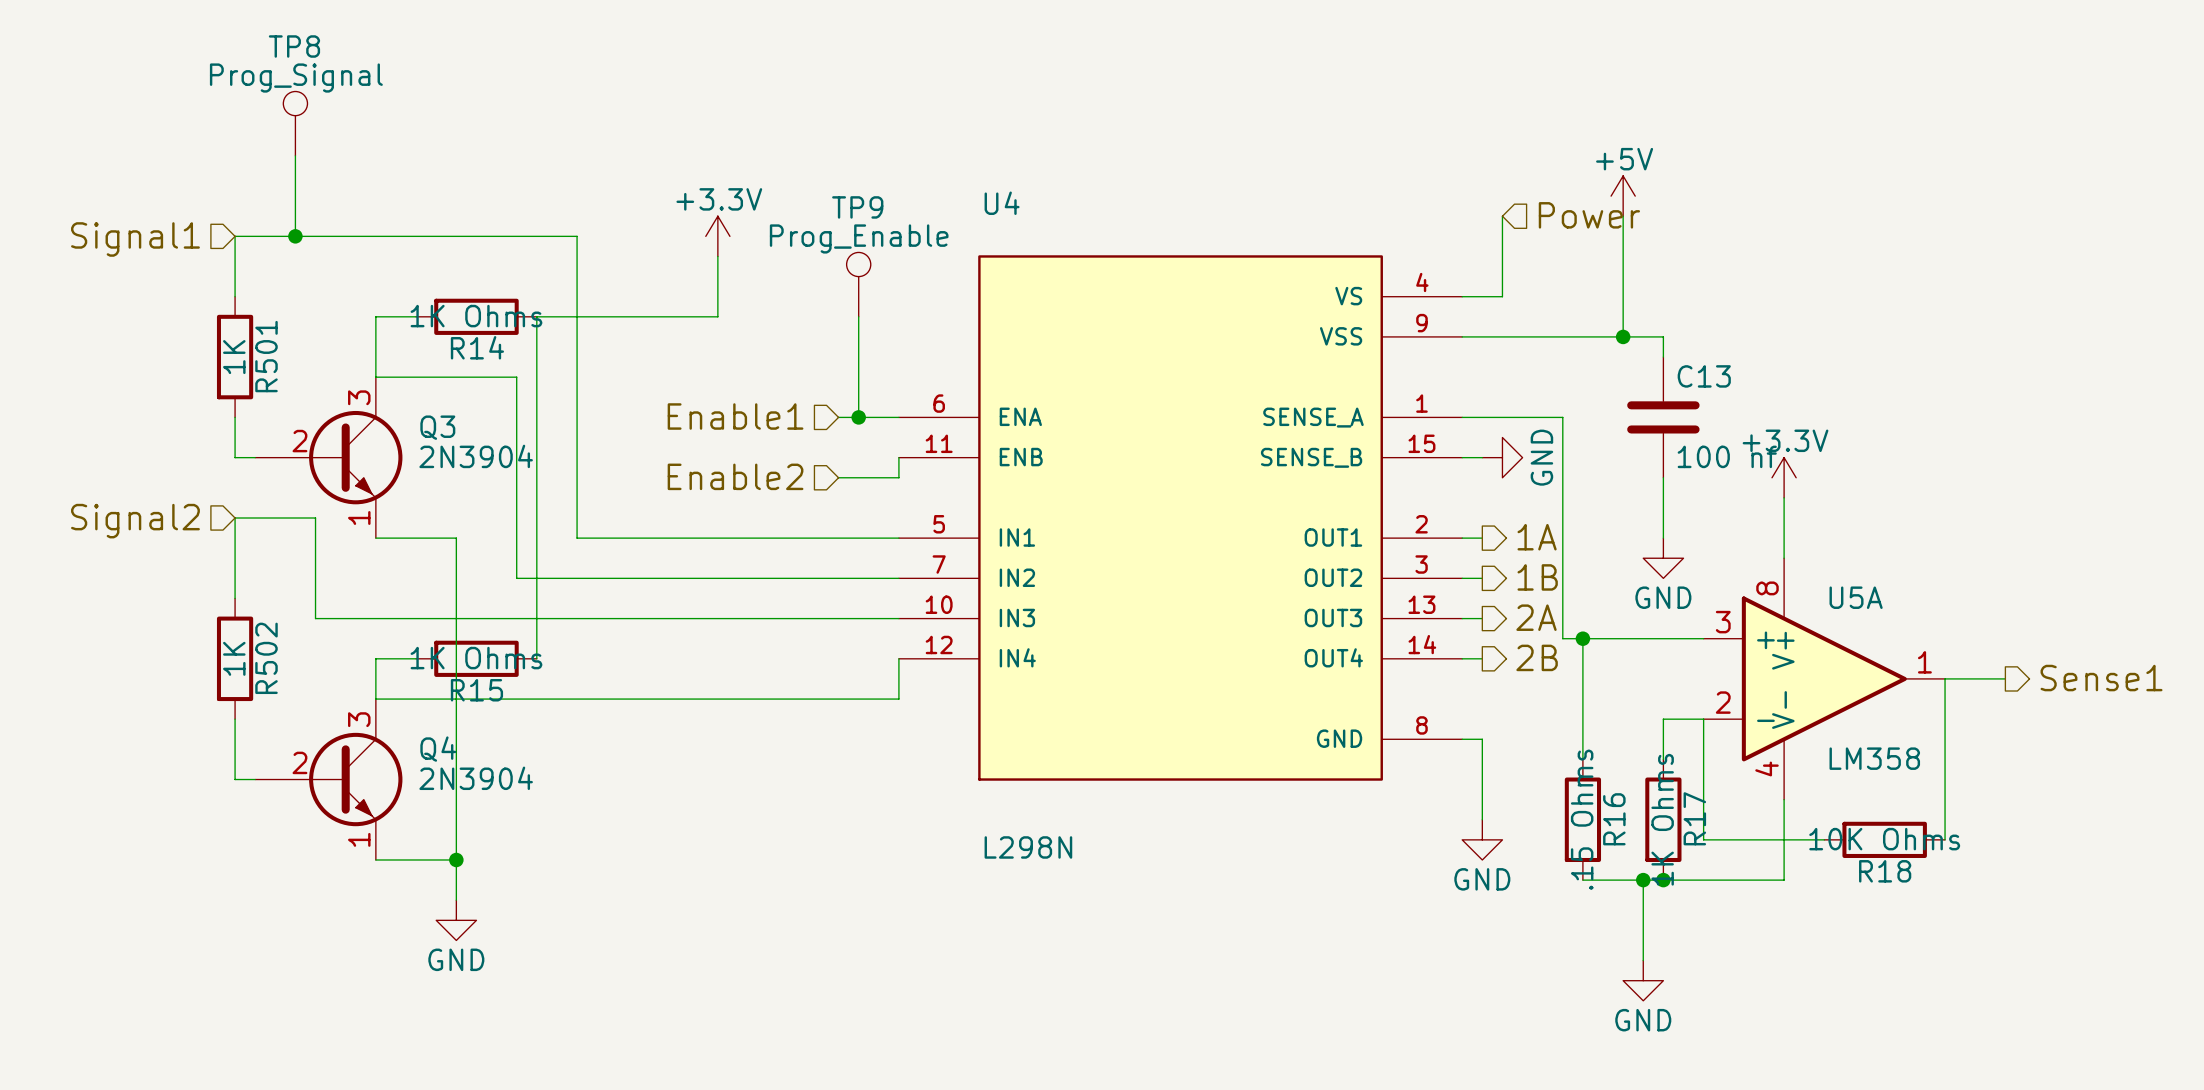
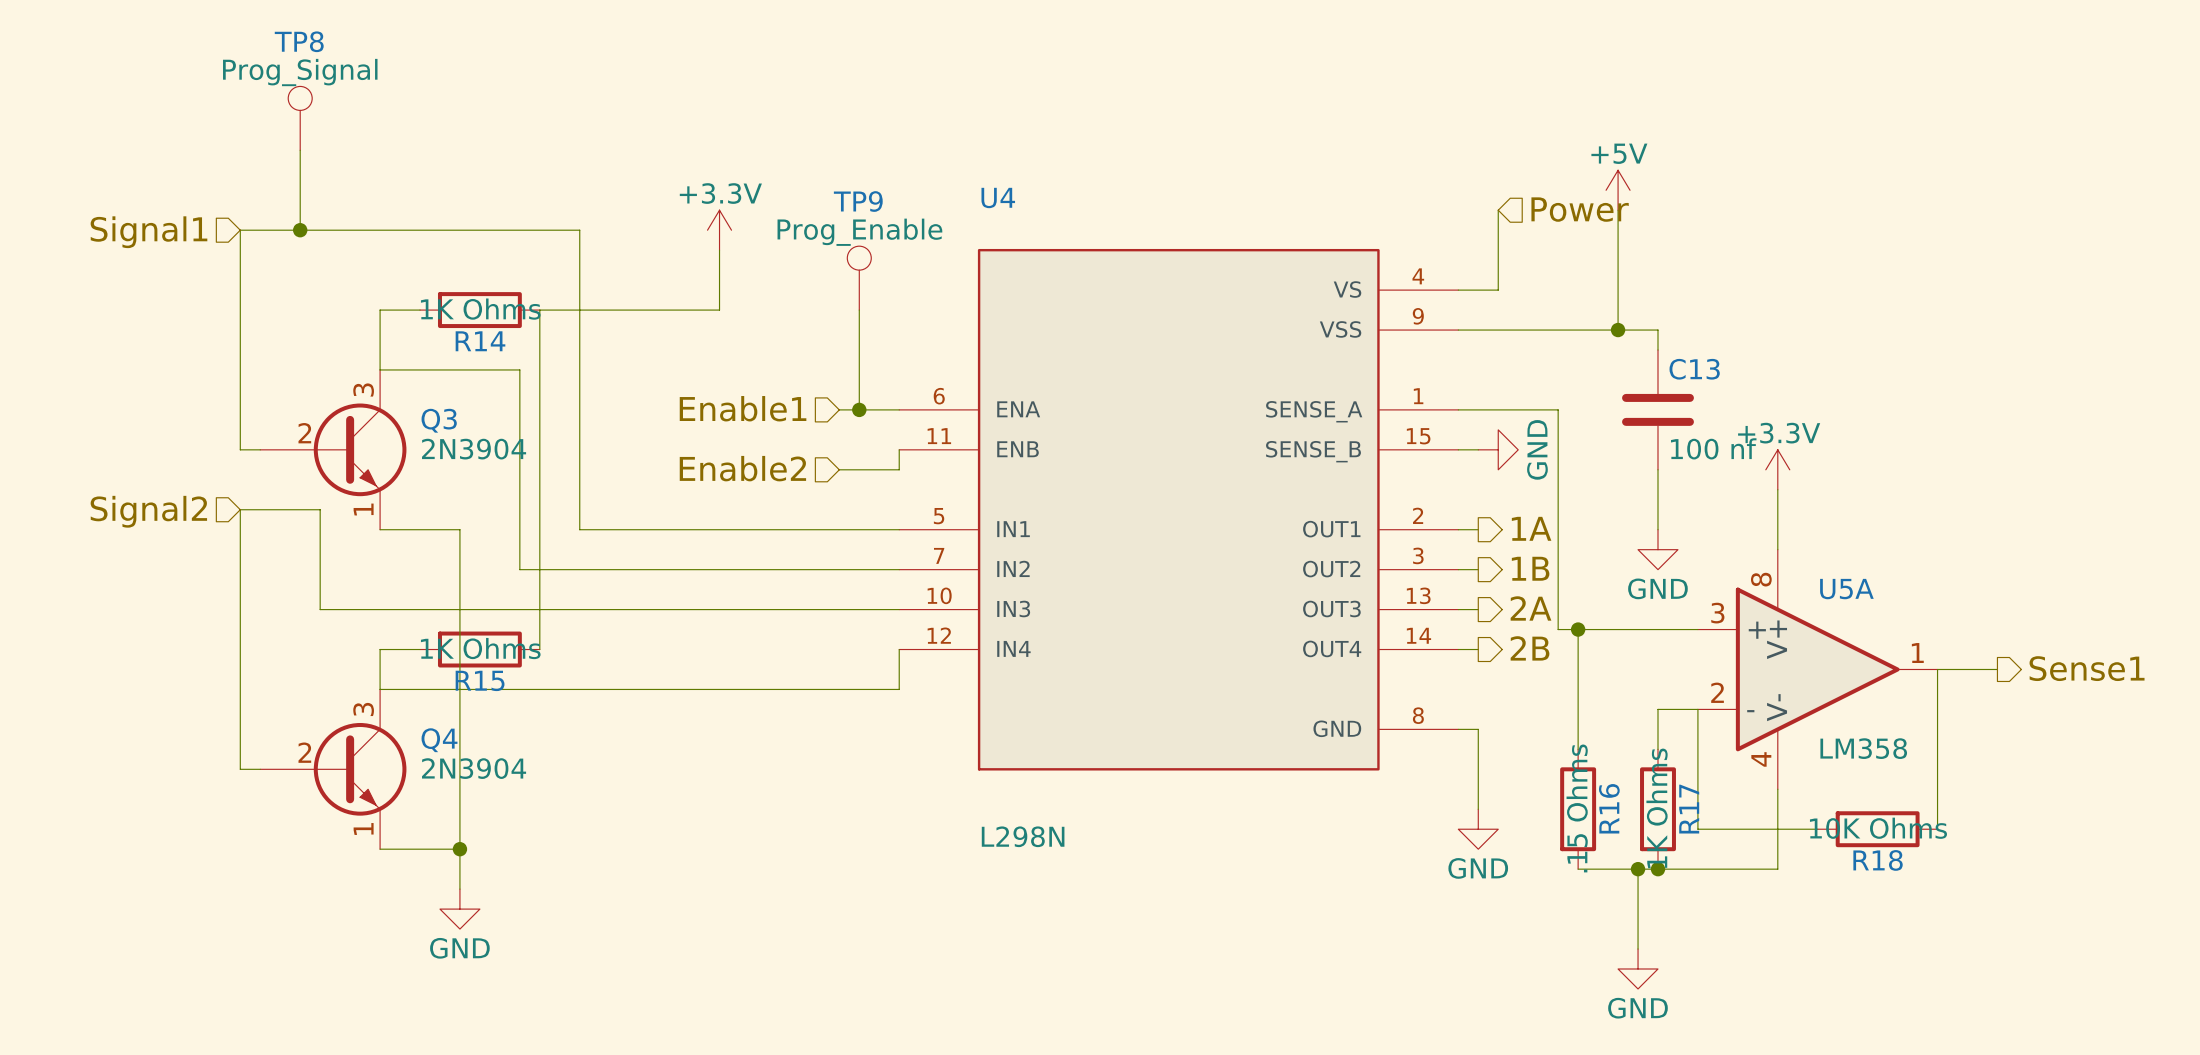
wire: none -> (240, 290) (240, 409)
R501: 1K (235, 357) -> none
wire: none -> (240, 589) (240, 709)
R502: 1K (235, 658) -> none

